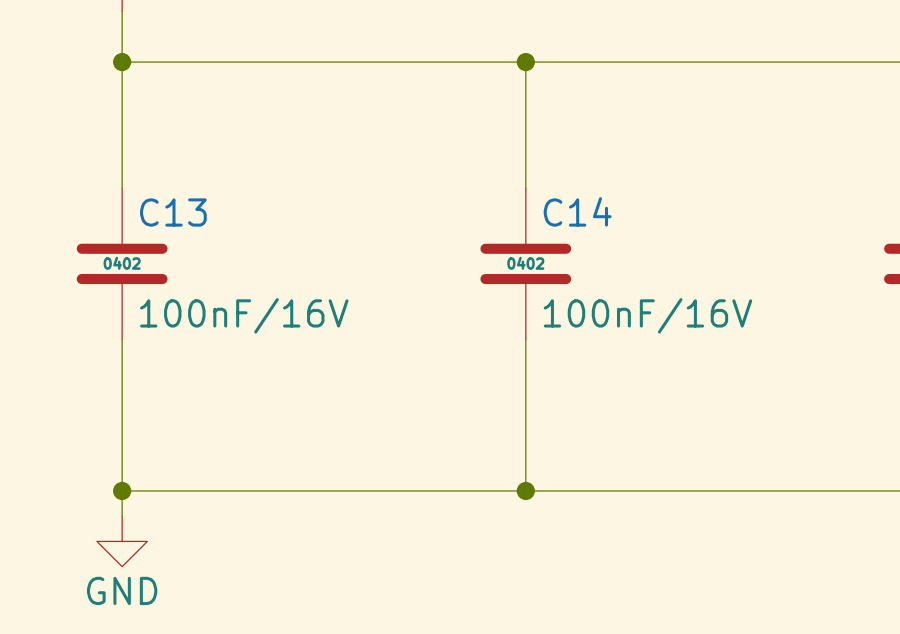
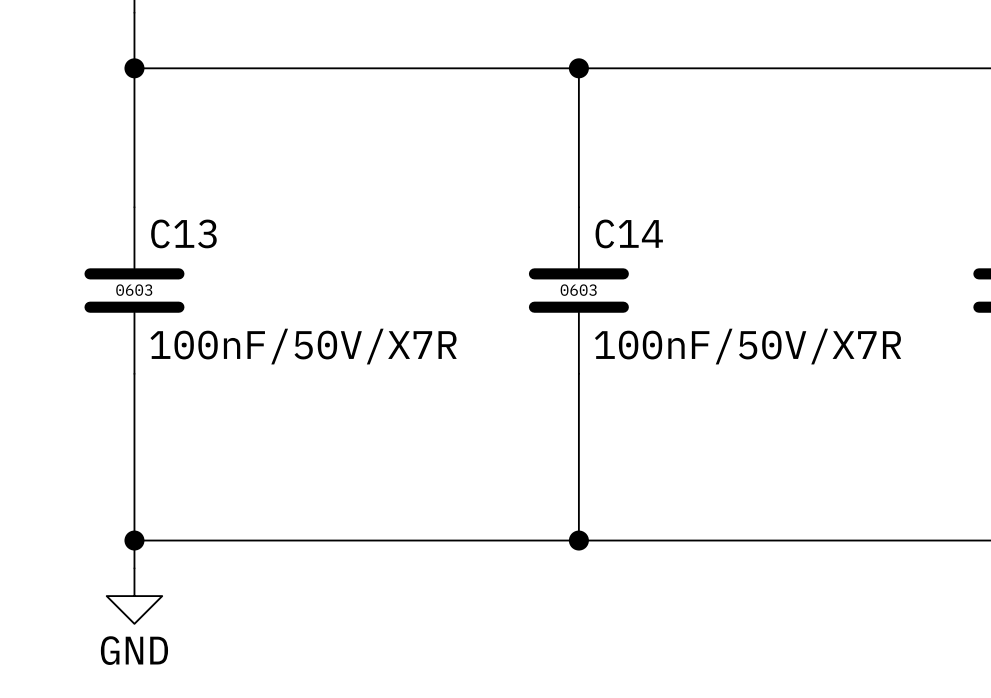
C13 text: 0402 (122, 263) -> 0603 (134, 290)
C14 text: 0402 (525, 263) -> 0603 (578, 290)
C13 value: 100nF/16V (244, 315) -> 100nF/50V/X7R (303, 346)
C14 value: 100nF/16V (647, 315) -> 100nF/50V/X7R (748, 346)

